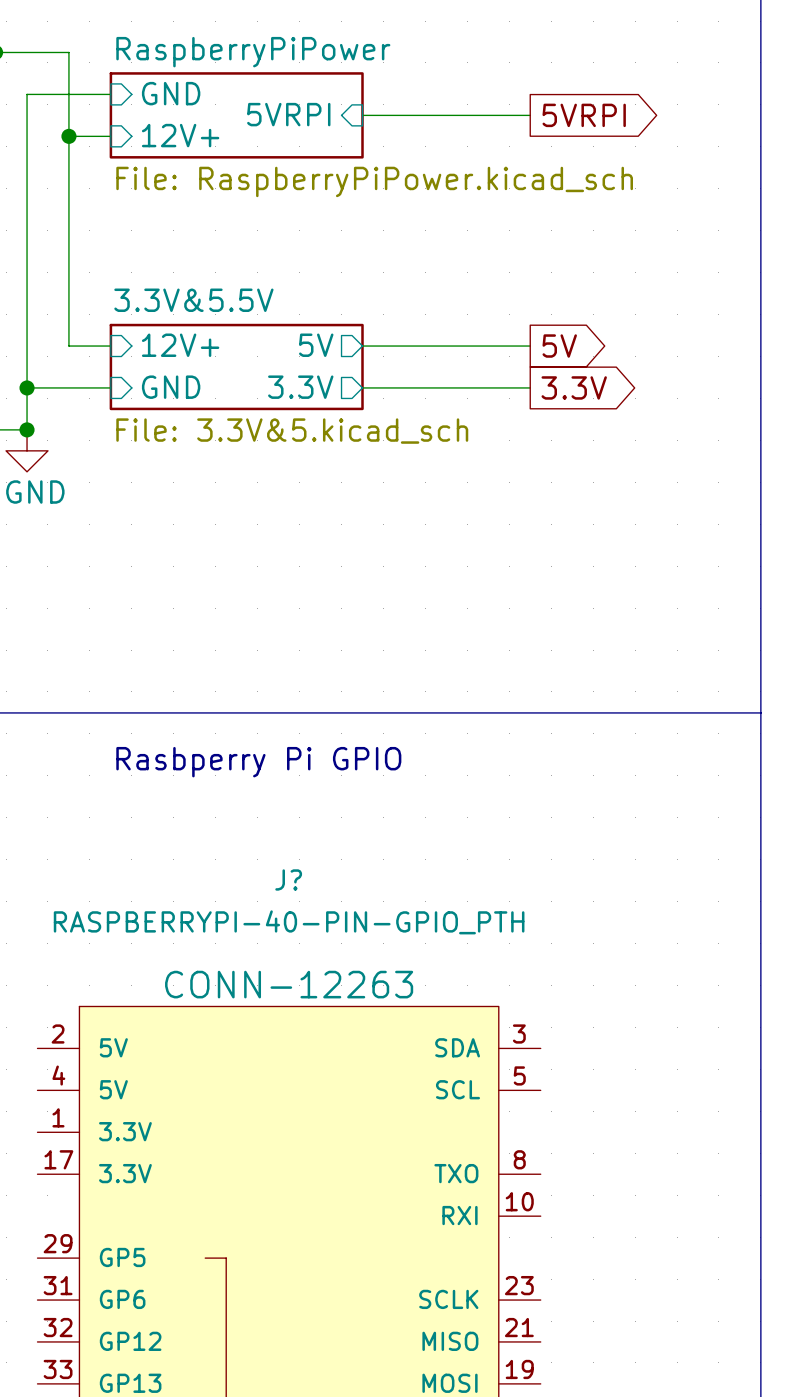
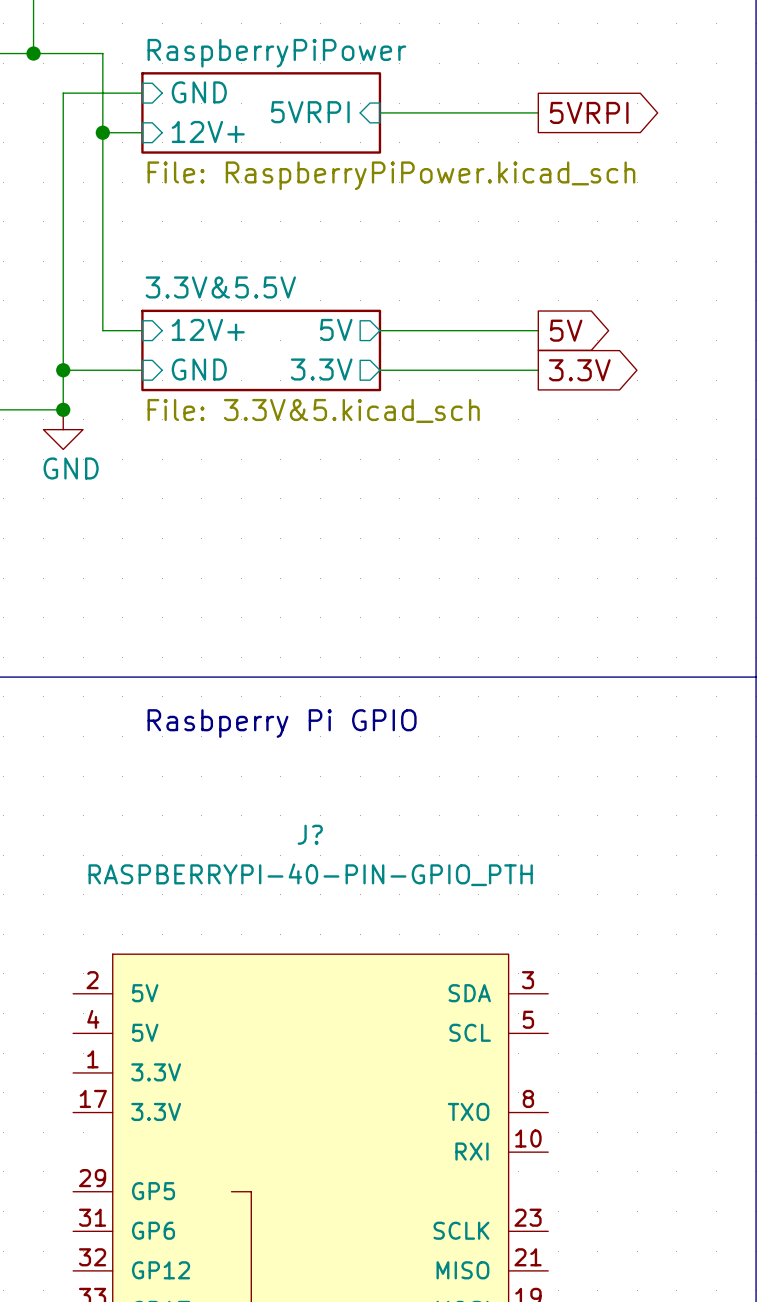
J? text: CONN-12263 (289, 984) -> none

